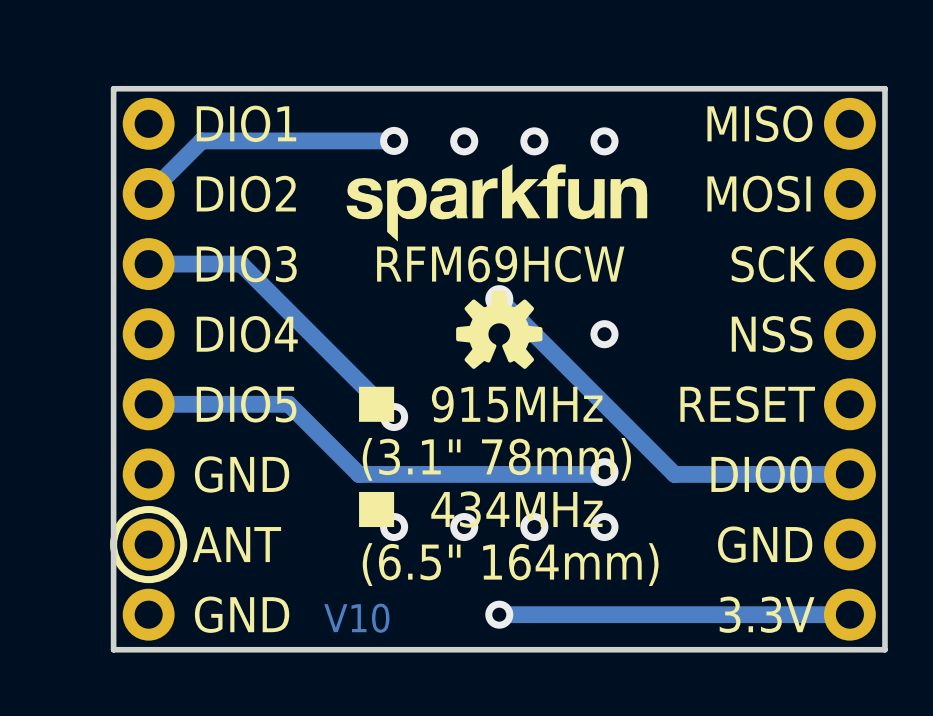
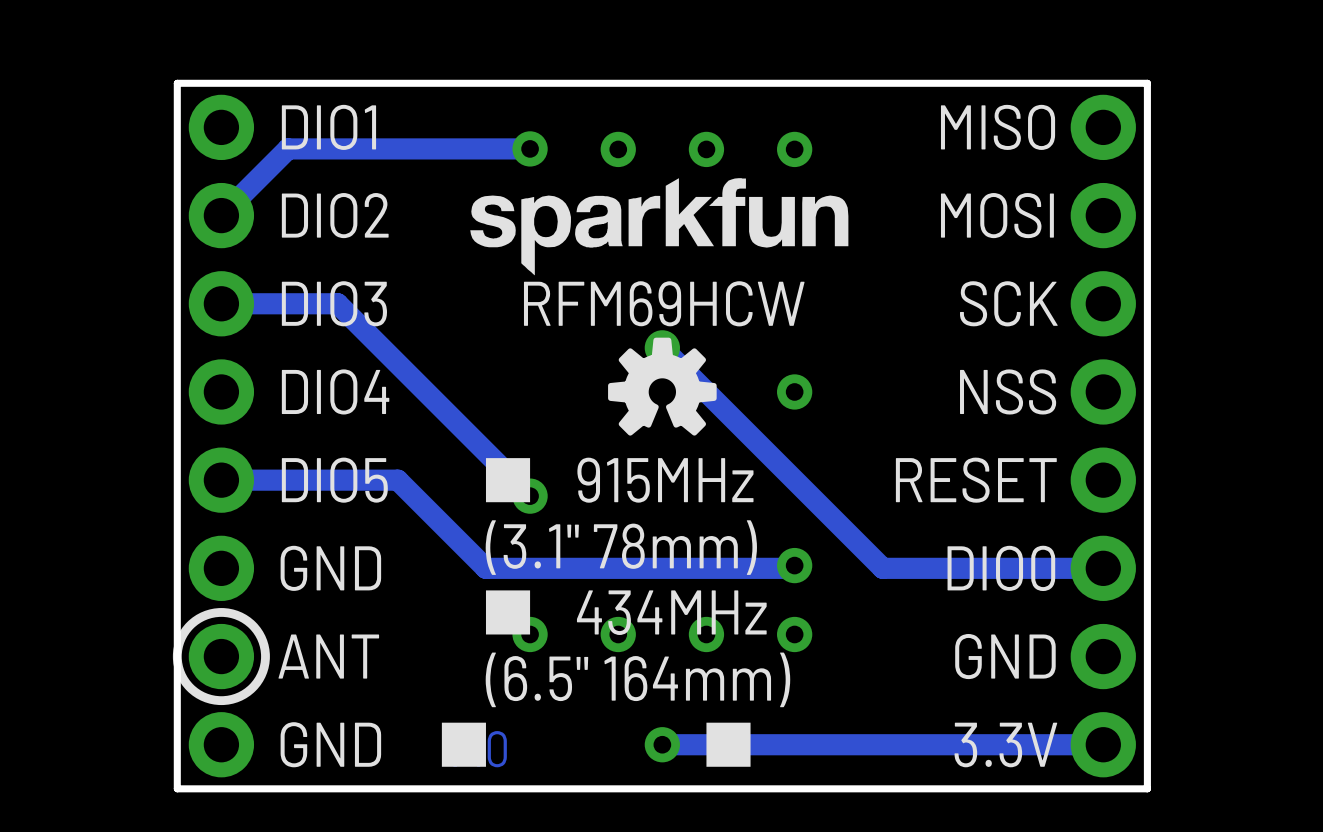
drawing: none -> [441, 722, 486, 767]
drawing: none -> [706, 722, 751, 767]

